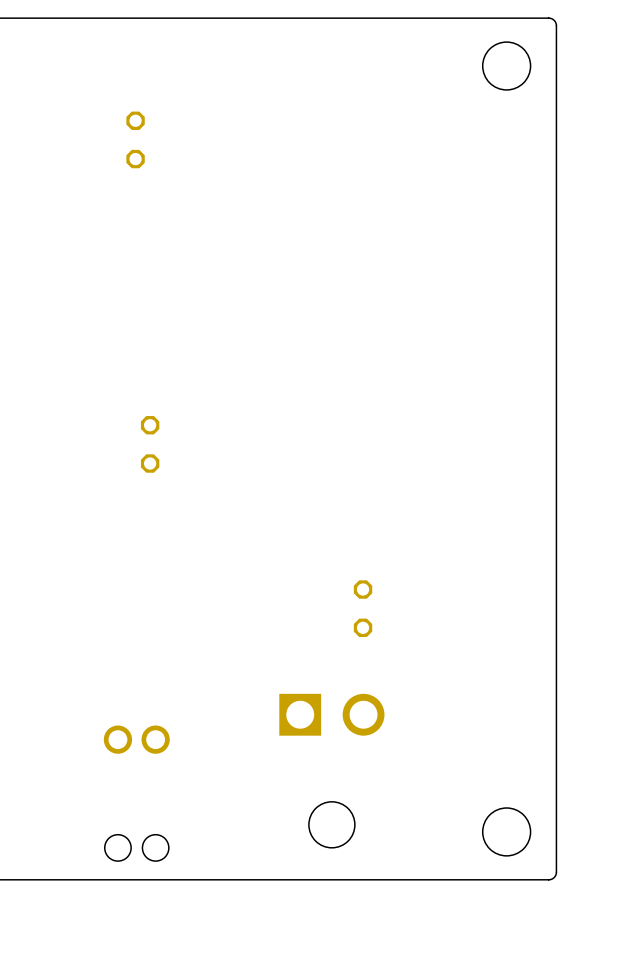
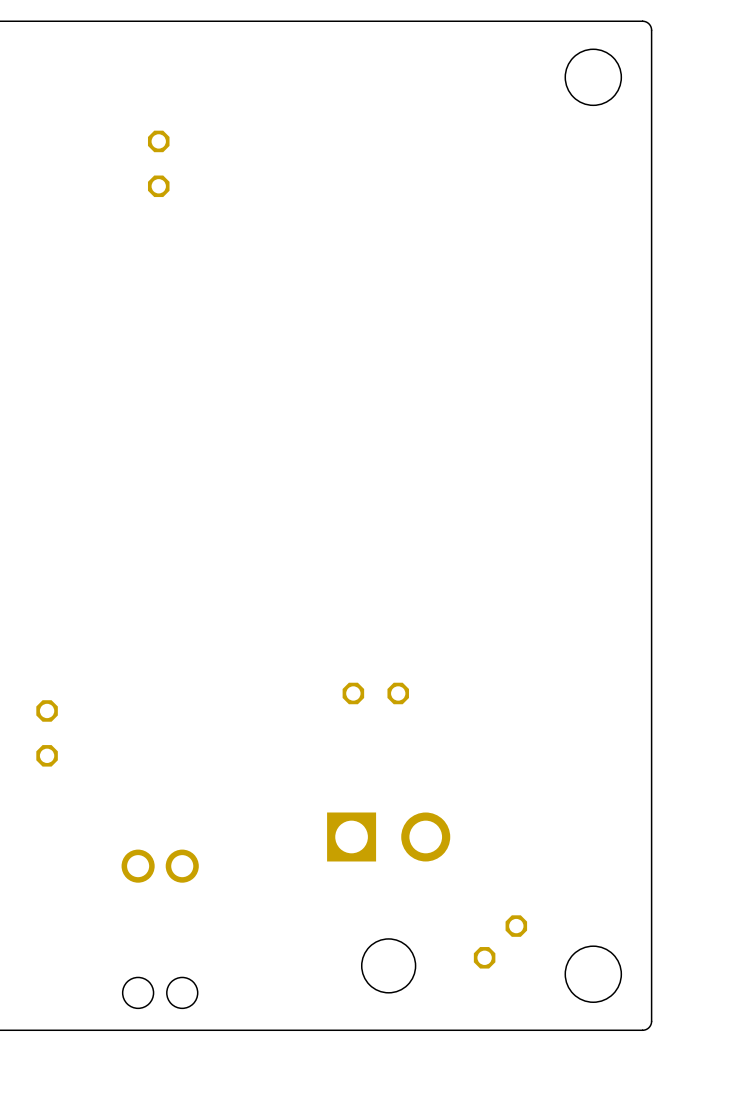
part: (150, 444) -> none
part rotation: 0° (363, 608) -> 90° clockwise (375, 693)
part position: (363, 608) -> (375, 693)
part: none -> (47, 733)
part: none -> (500, 941)

